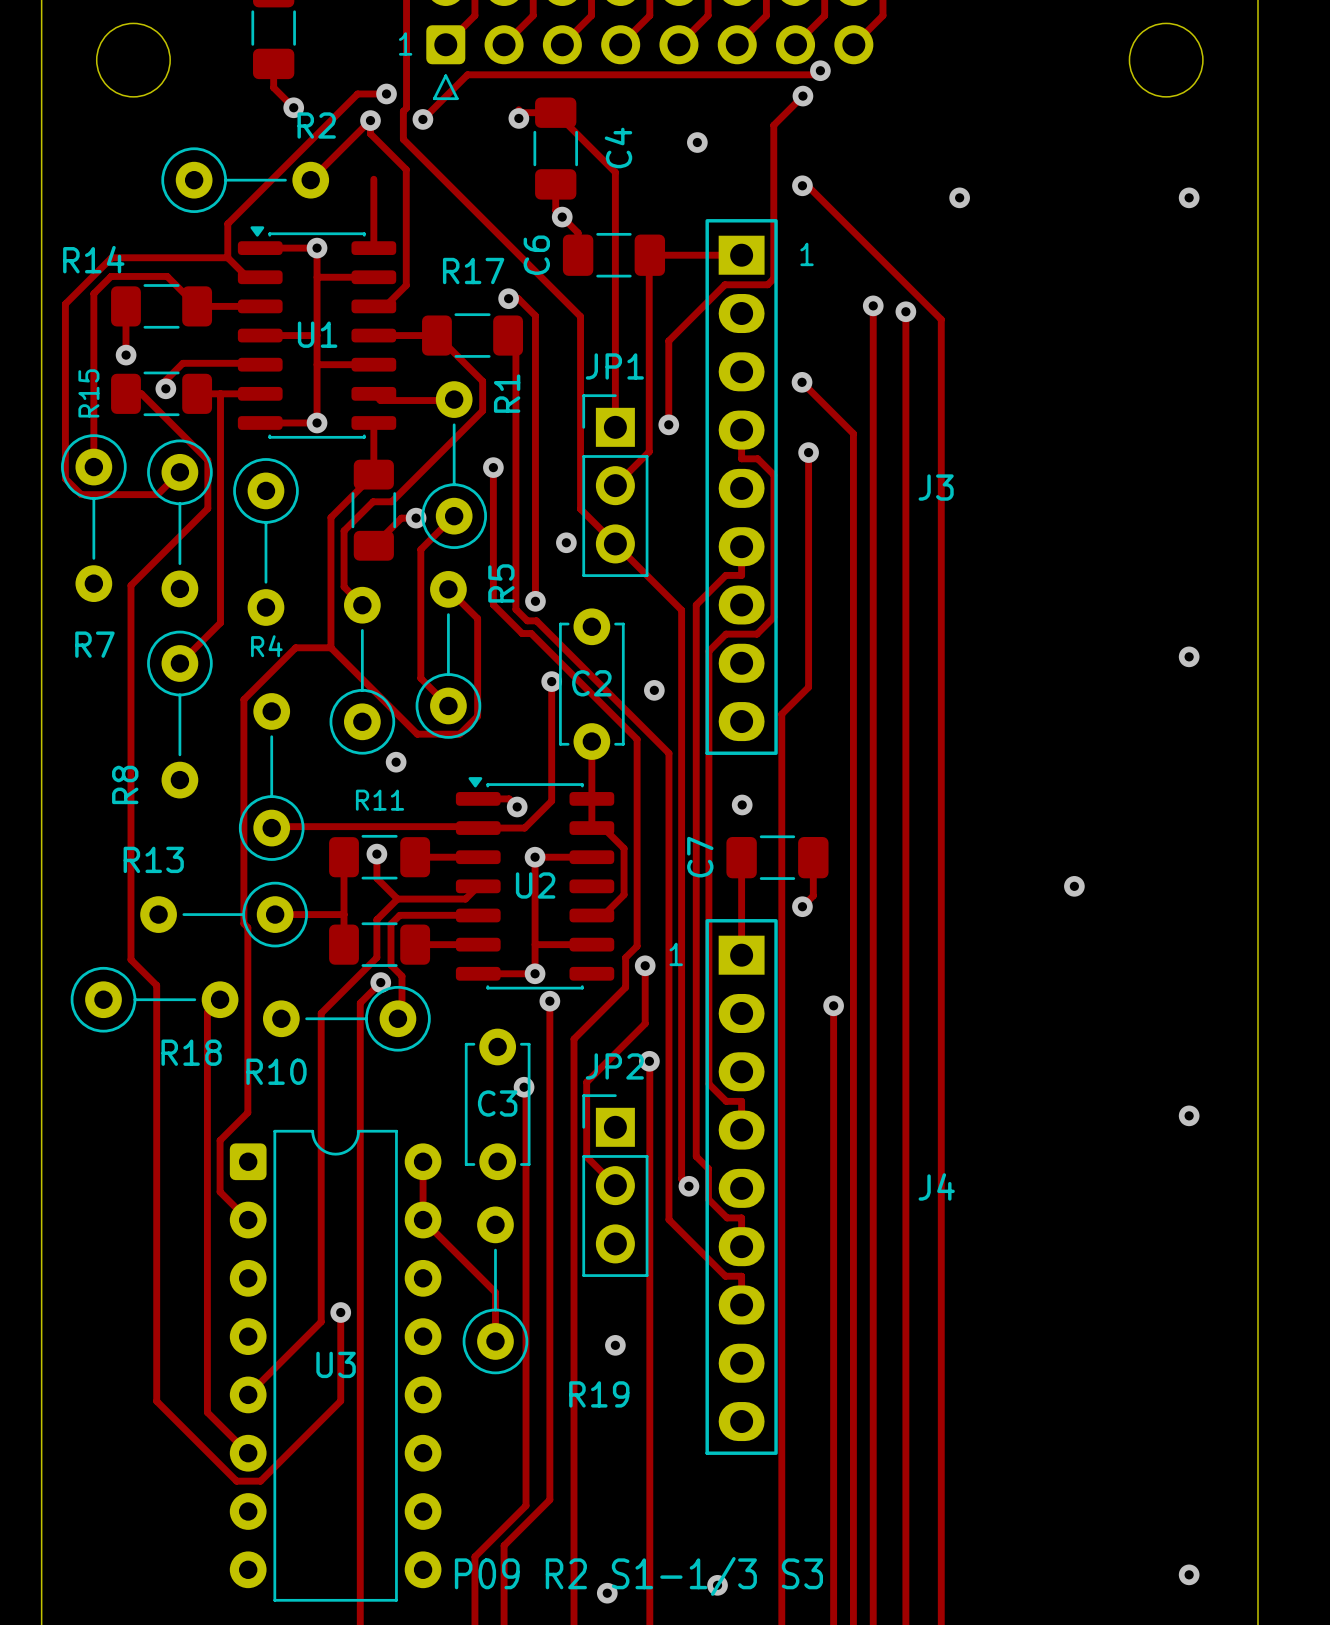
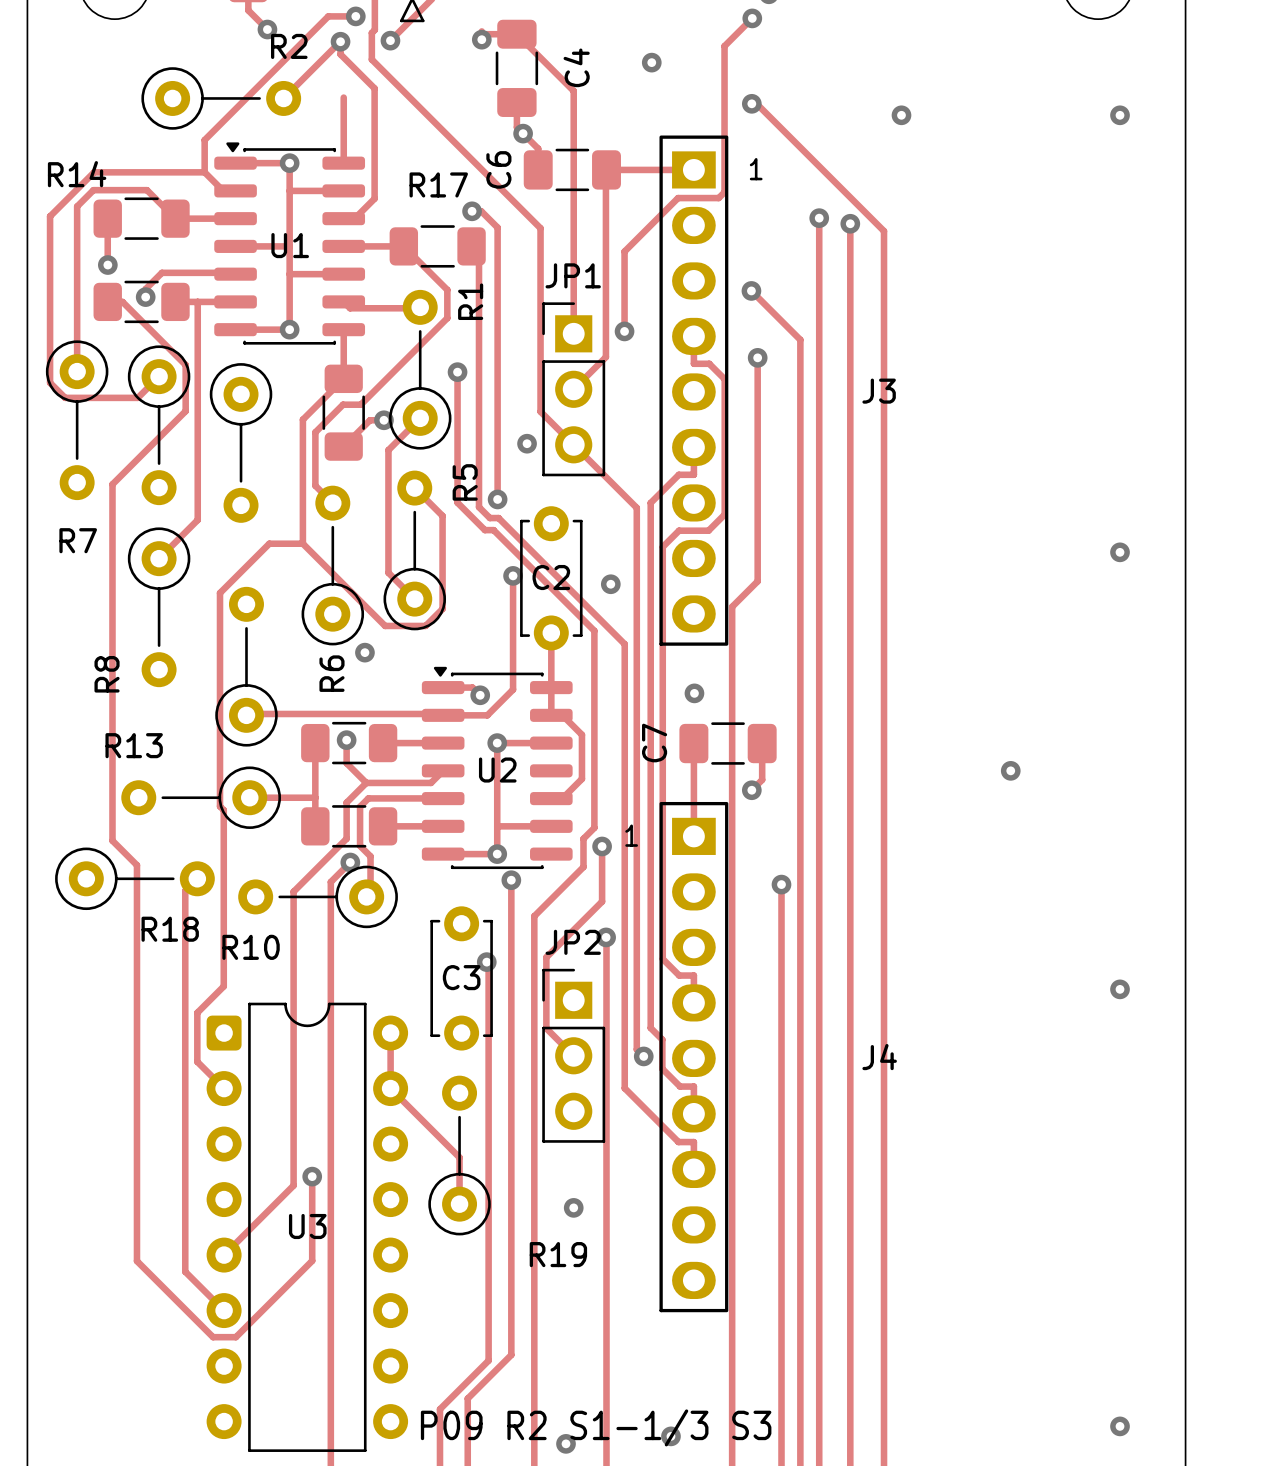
R15 name: R15 (88, 393) -> none
R4 name: R4 (266, 646) -> none
R6 name: none -> R6 (331, 673)
R11 name: R11 (380, 800) -> none

